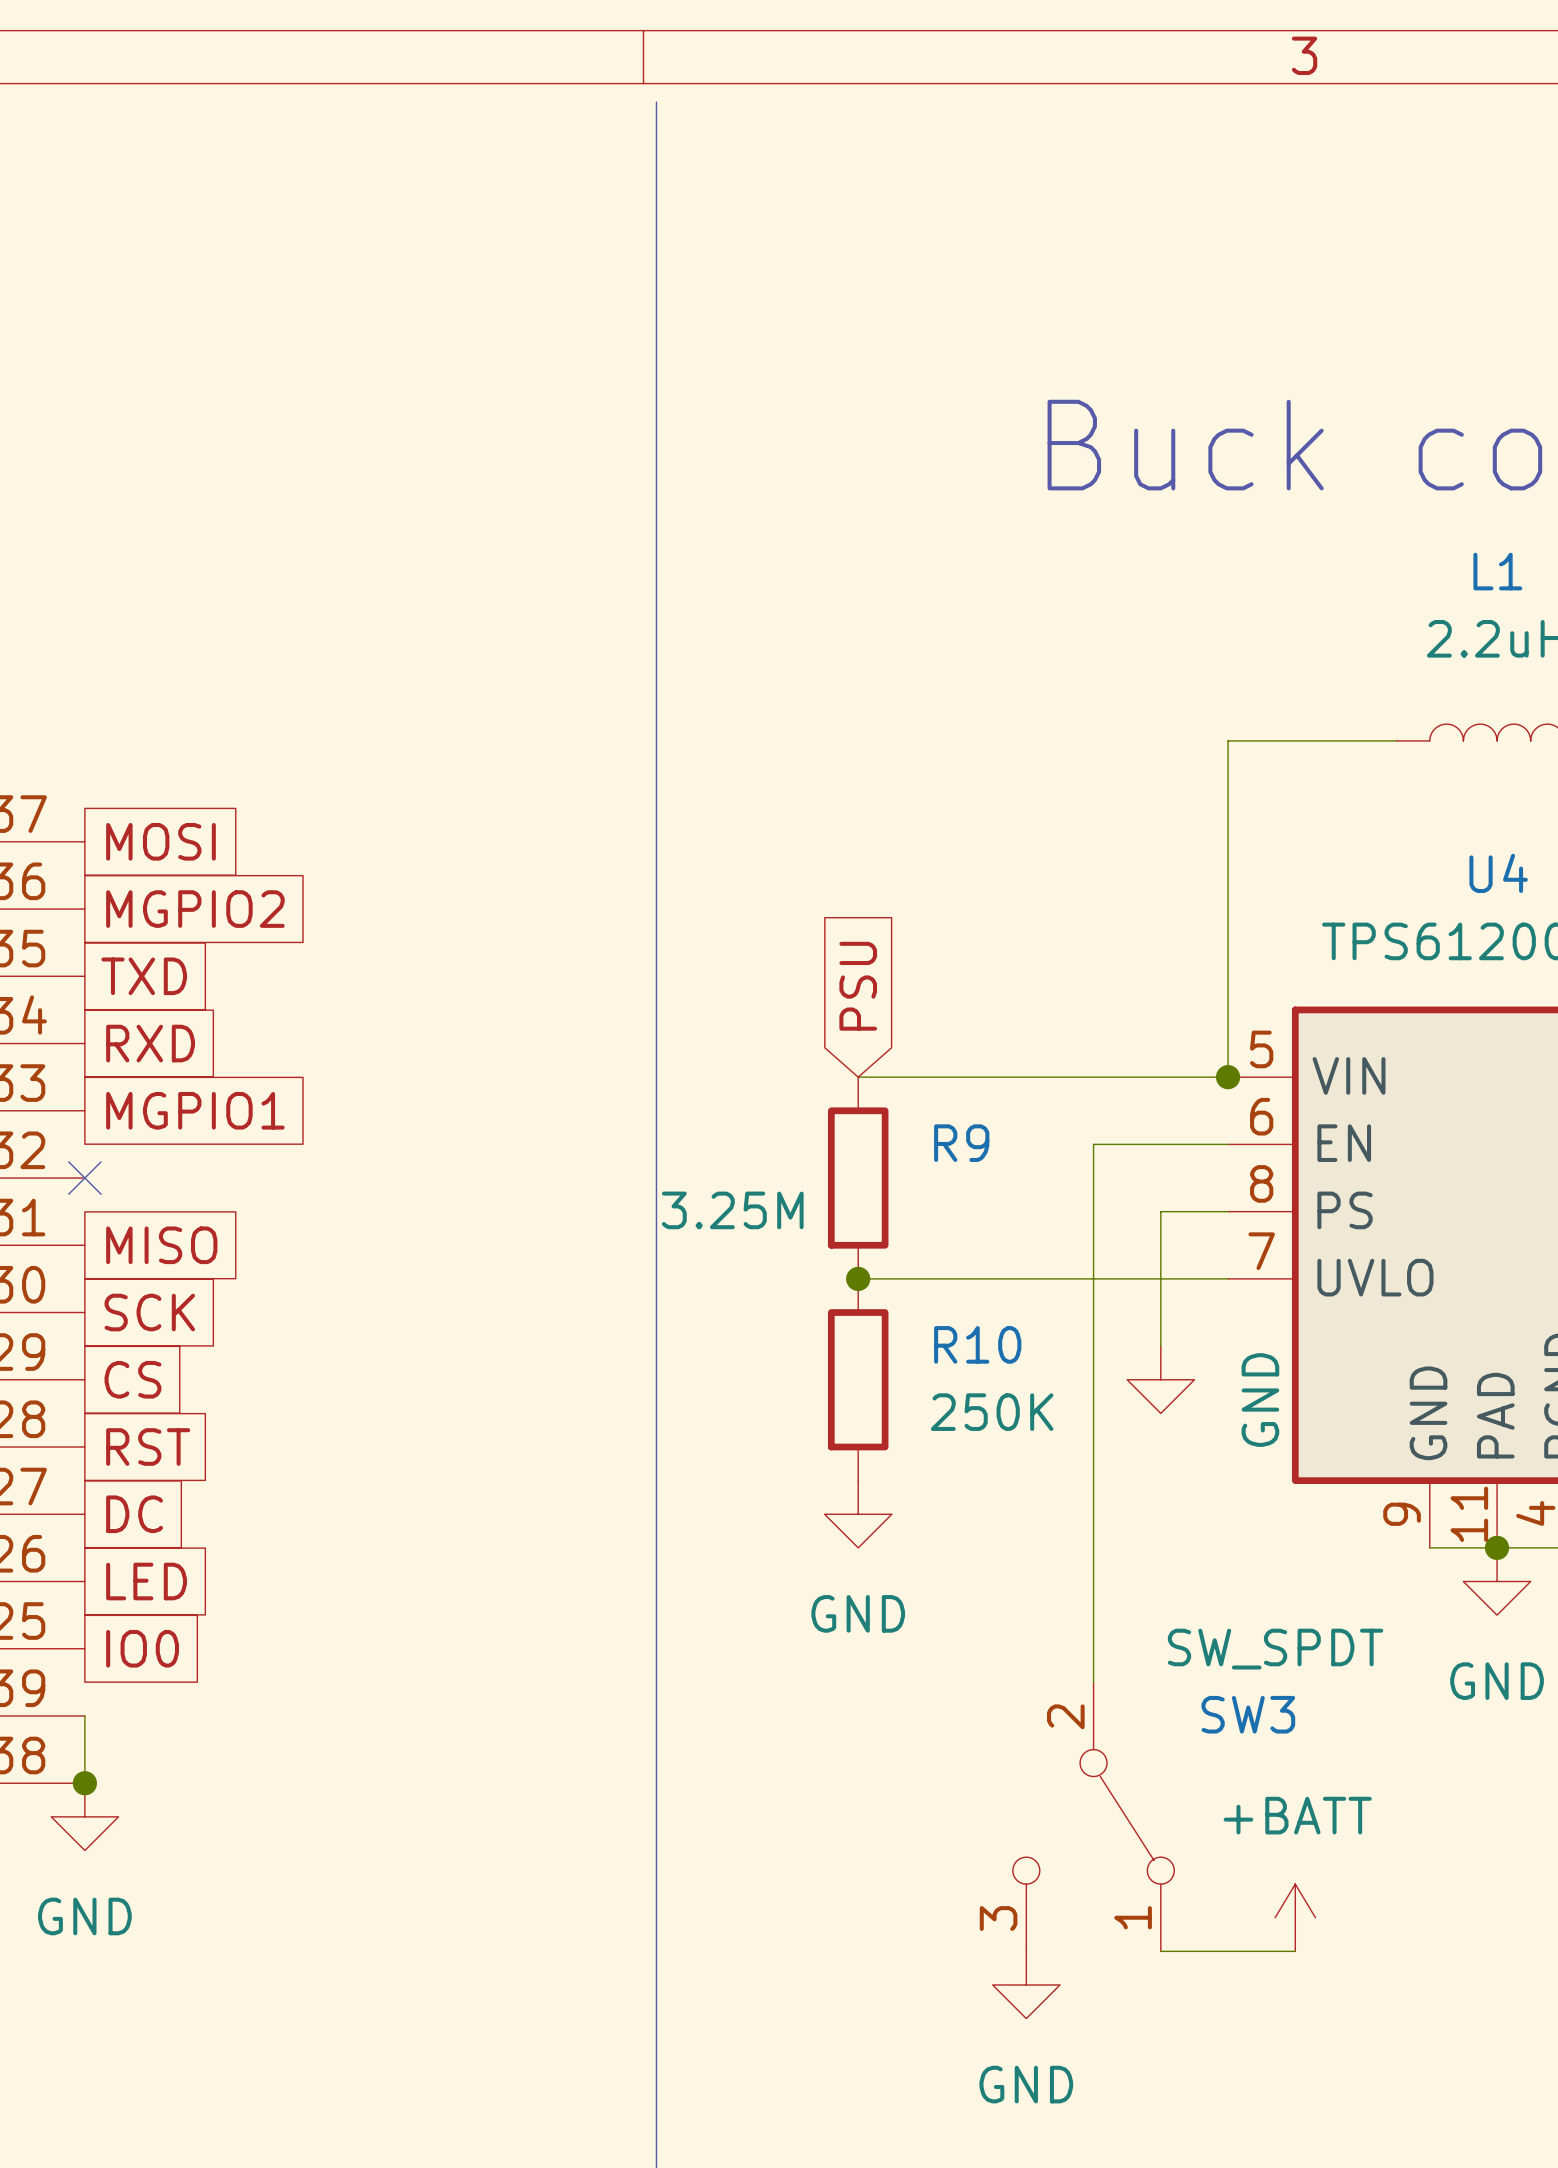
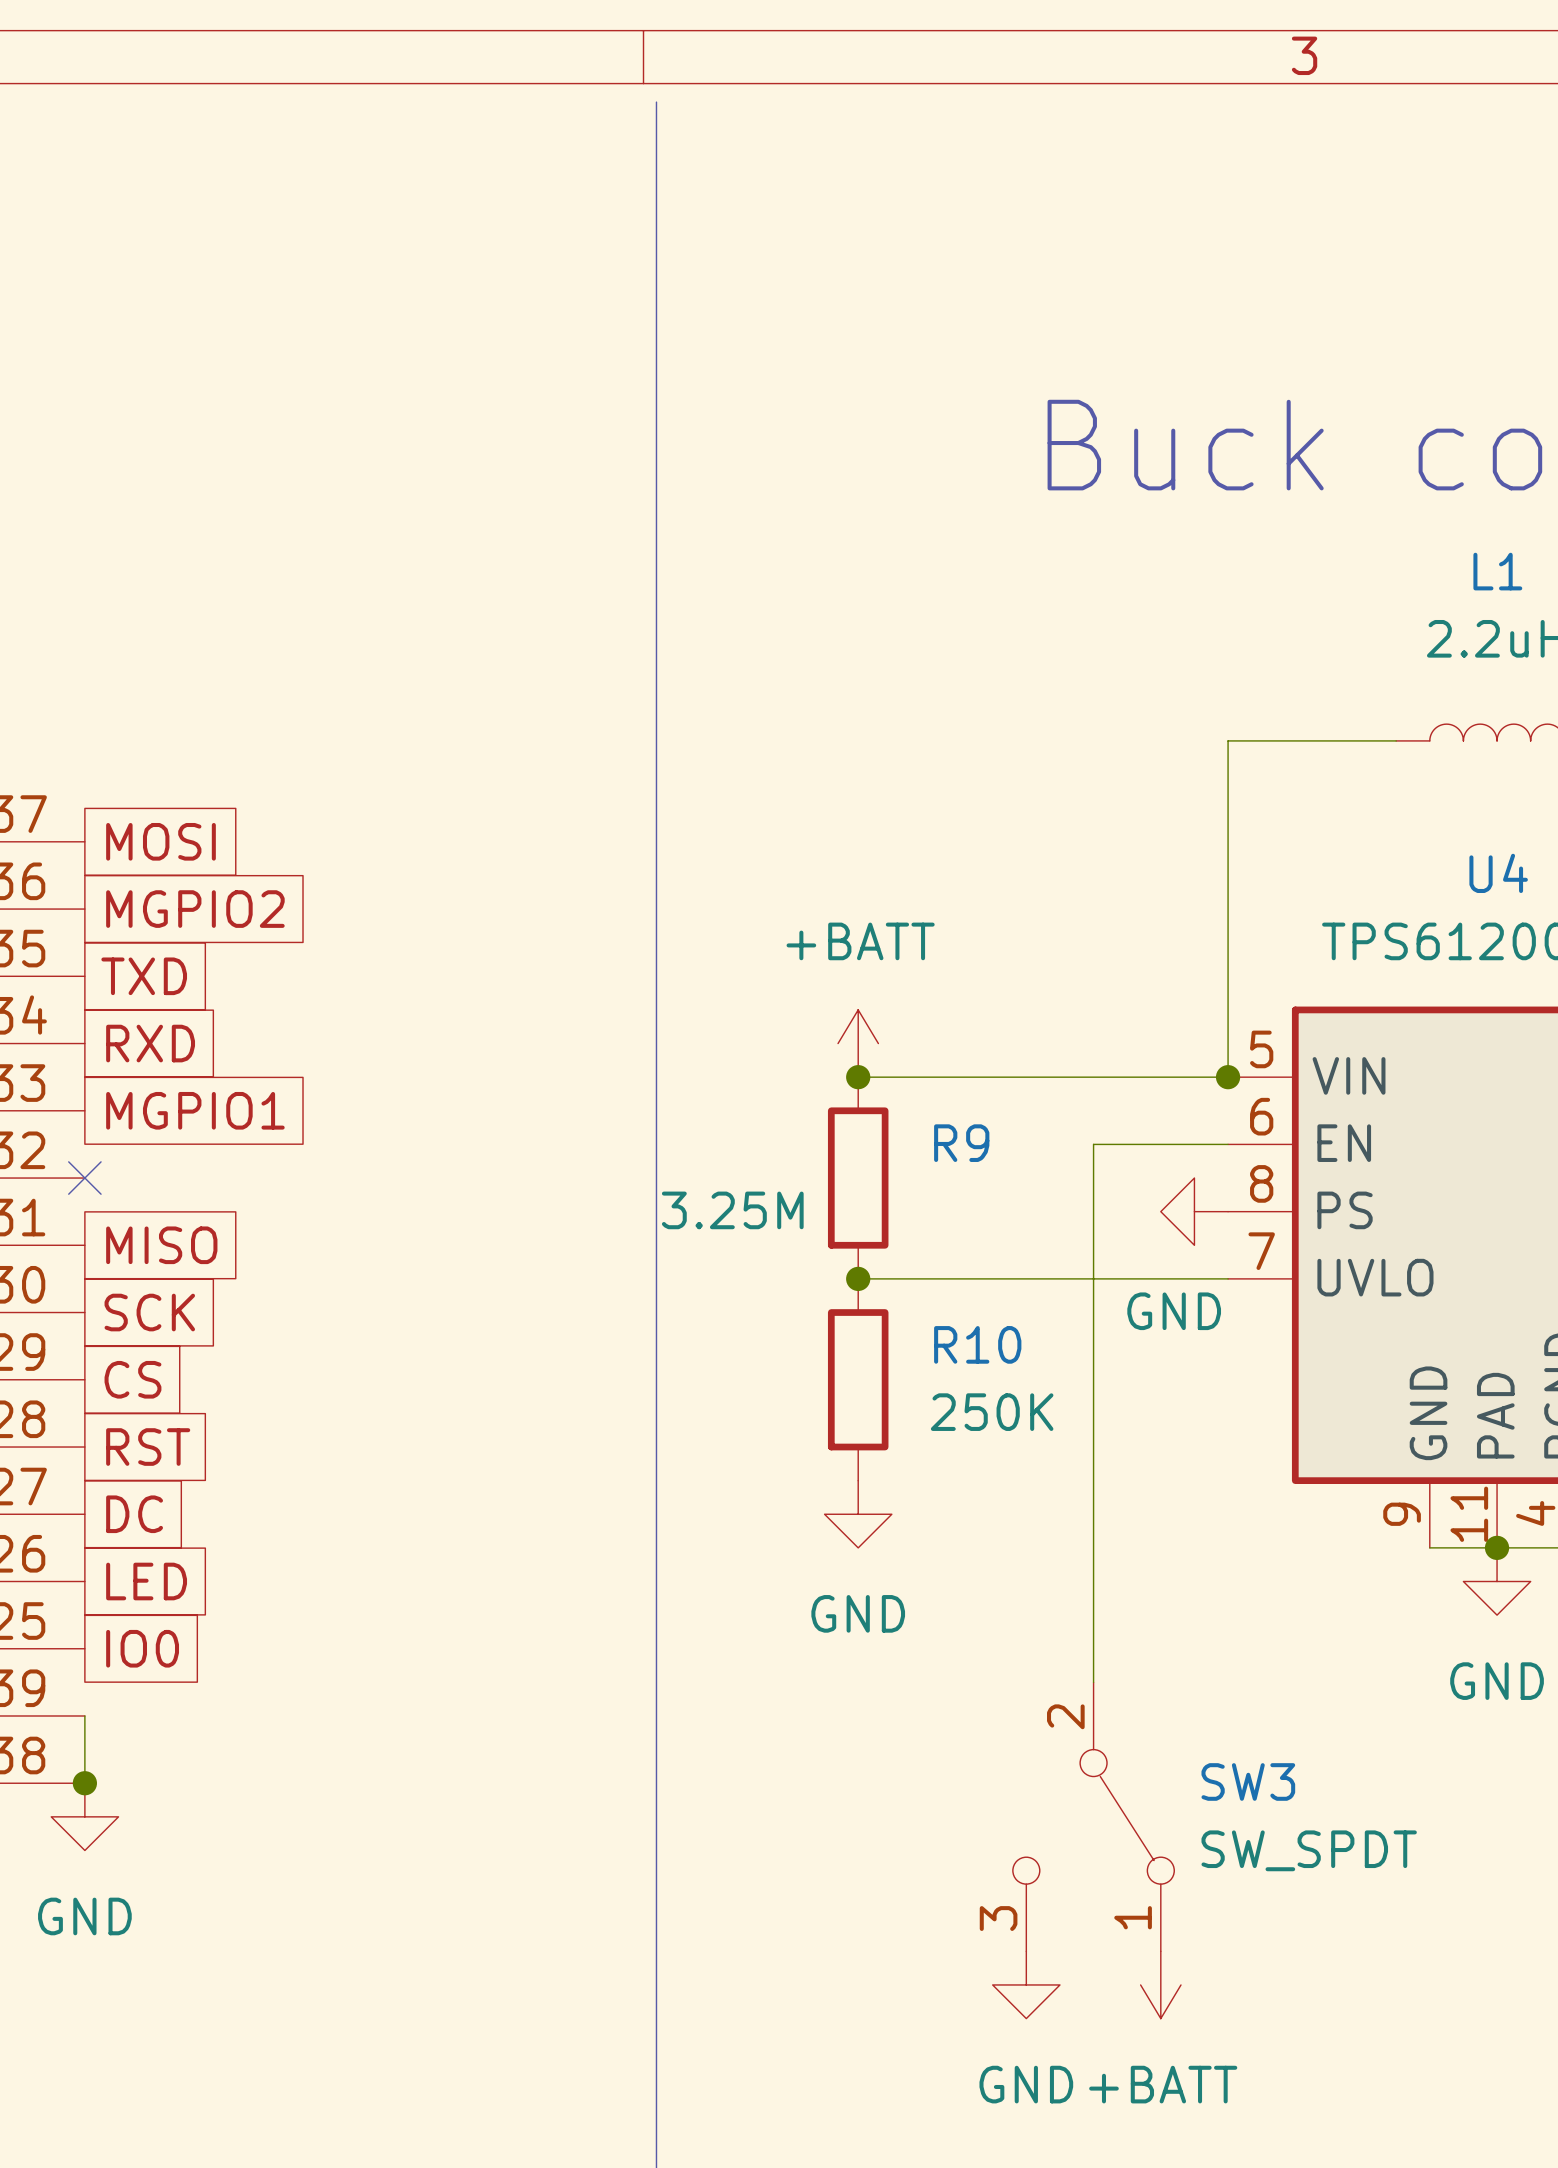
global label: PSU (858, 986) -> none
power symbol: none -> +BATT (858, 1043)
junction: none -> (858, 1077)
wire: (1228, 1211) (1160, 1211) (1160, 1346) -> none
power symbol rotation: 0° (1160, 1379) -> 90° clockwise (1194, 1211)
power symbol position: GND (1160, 1379) -> GND (1194, 1211)
SW3 value position: SW_SPDT (1275, 1649) -> SW_SPDT (1309, 1850)
SW3 name position: SW3 (1248, 1714) -> SW3 (1248, 1781)
power symbol rotation: 0° (1295, 1917) -> 180° (1160, 1984)
power symbol position: +BATT (1295, 1917) -> +BATT (1160, 1984)
wire: (1160, 1951) (1295, 1951) -> none

